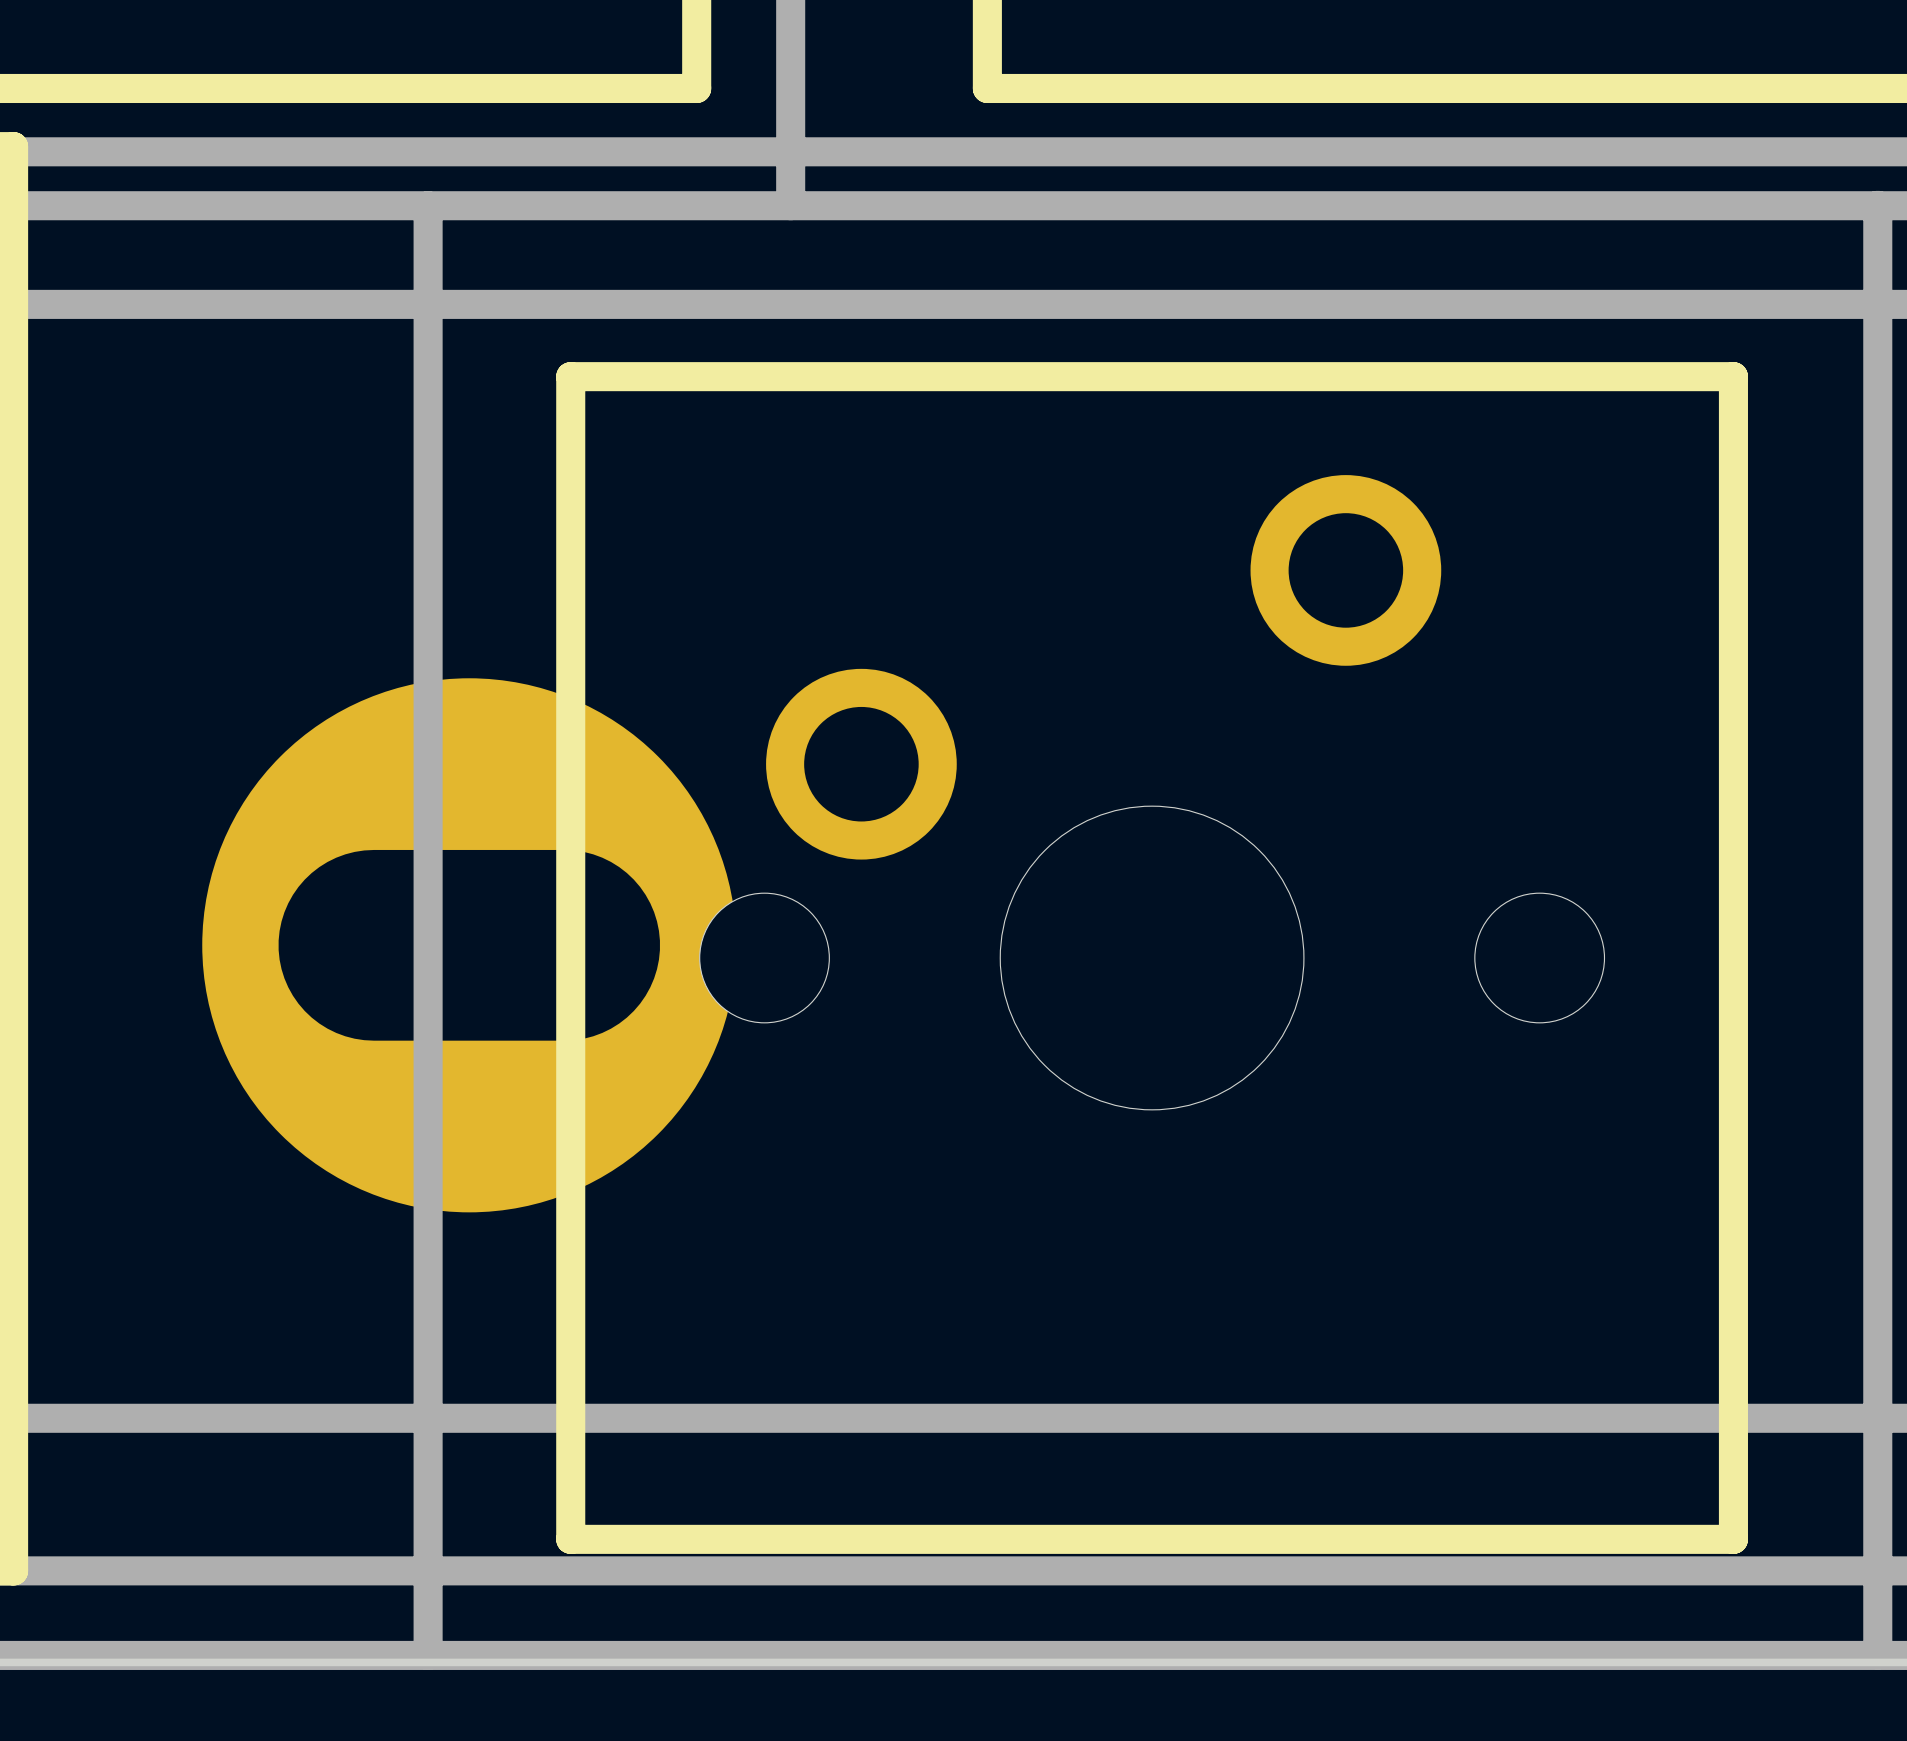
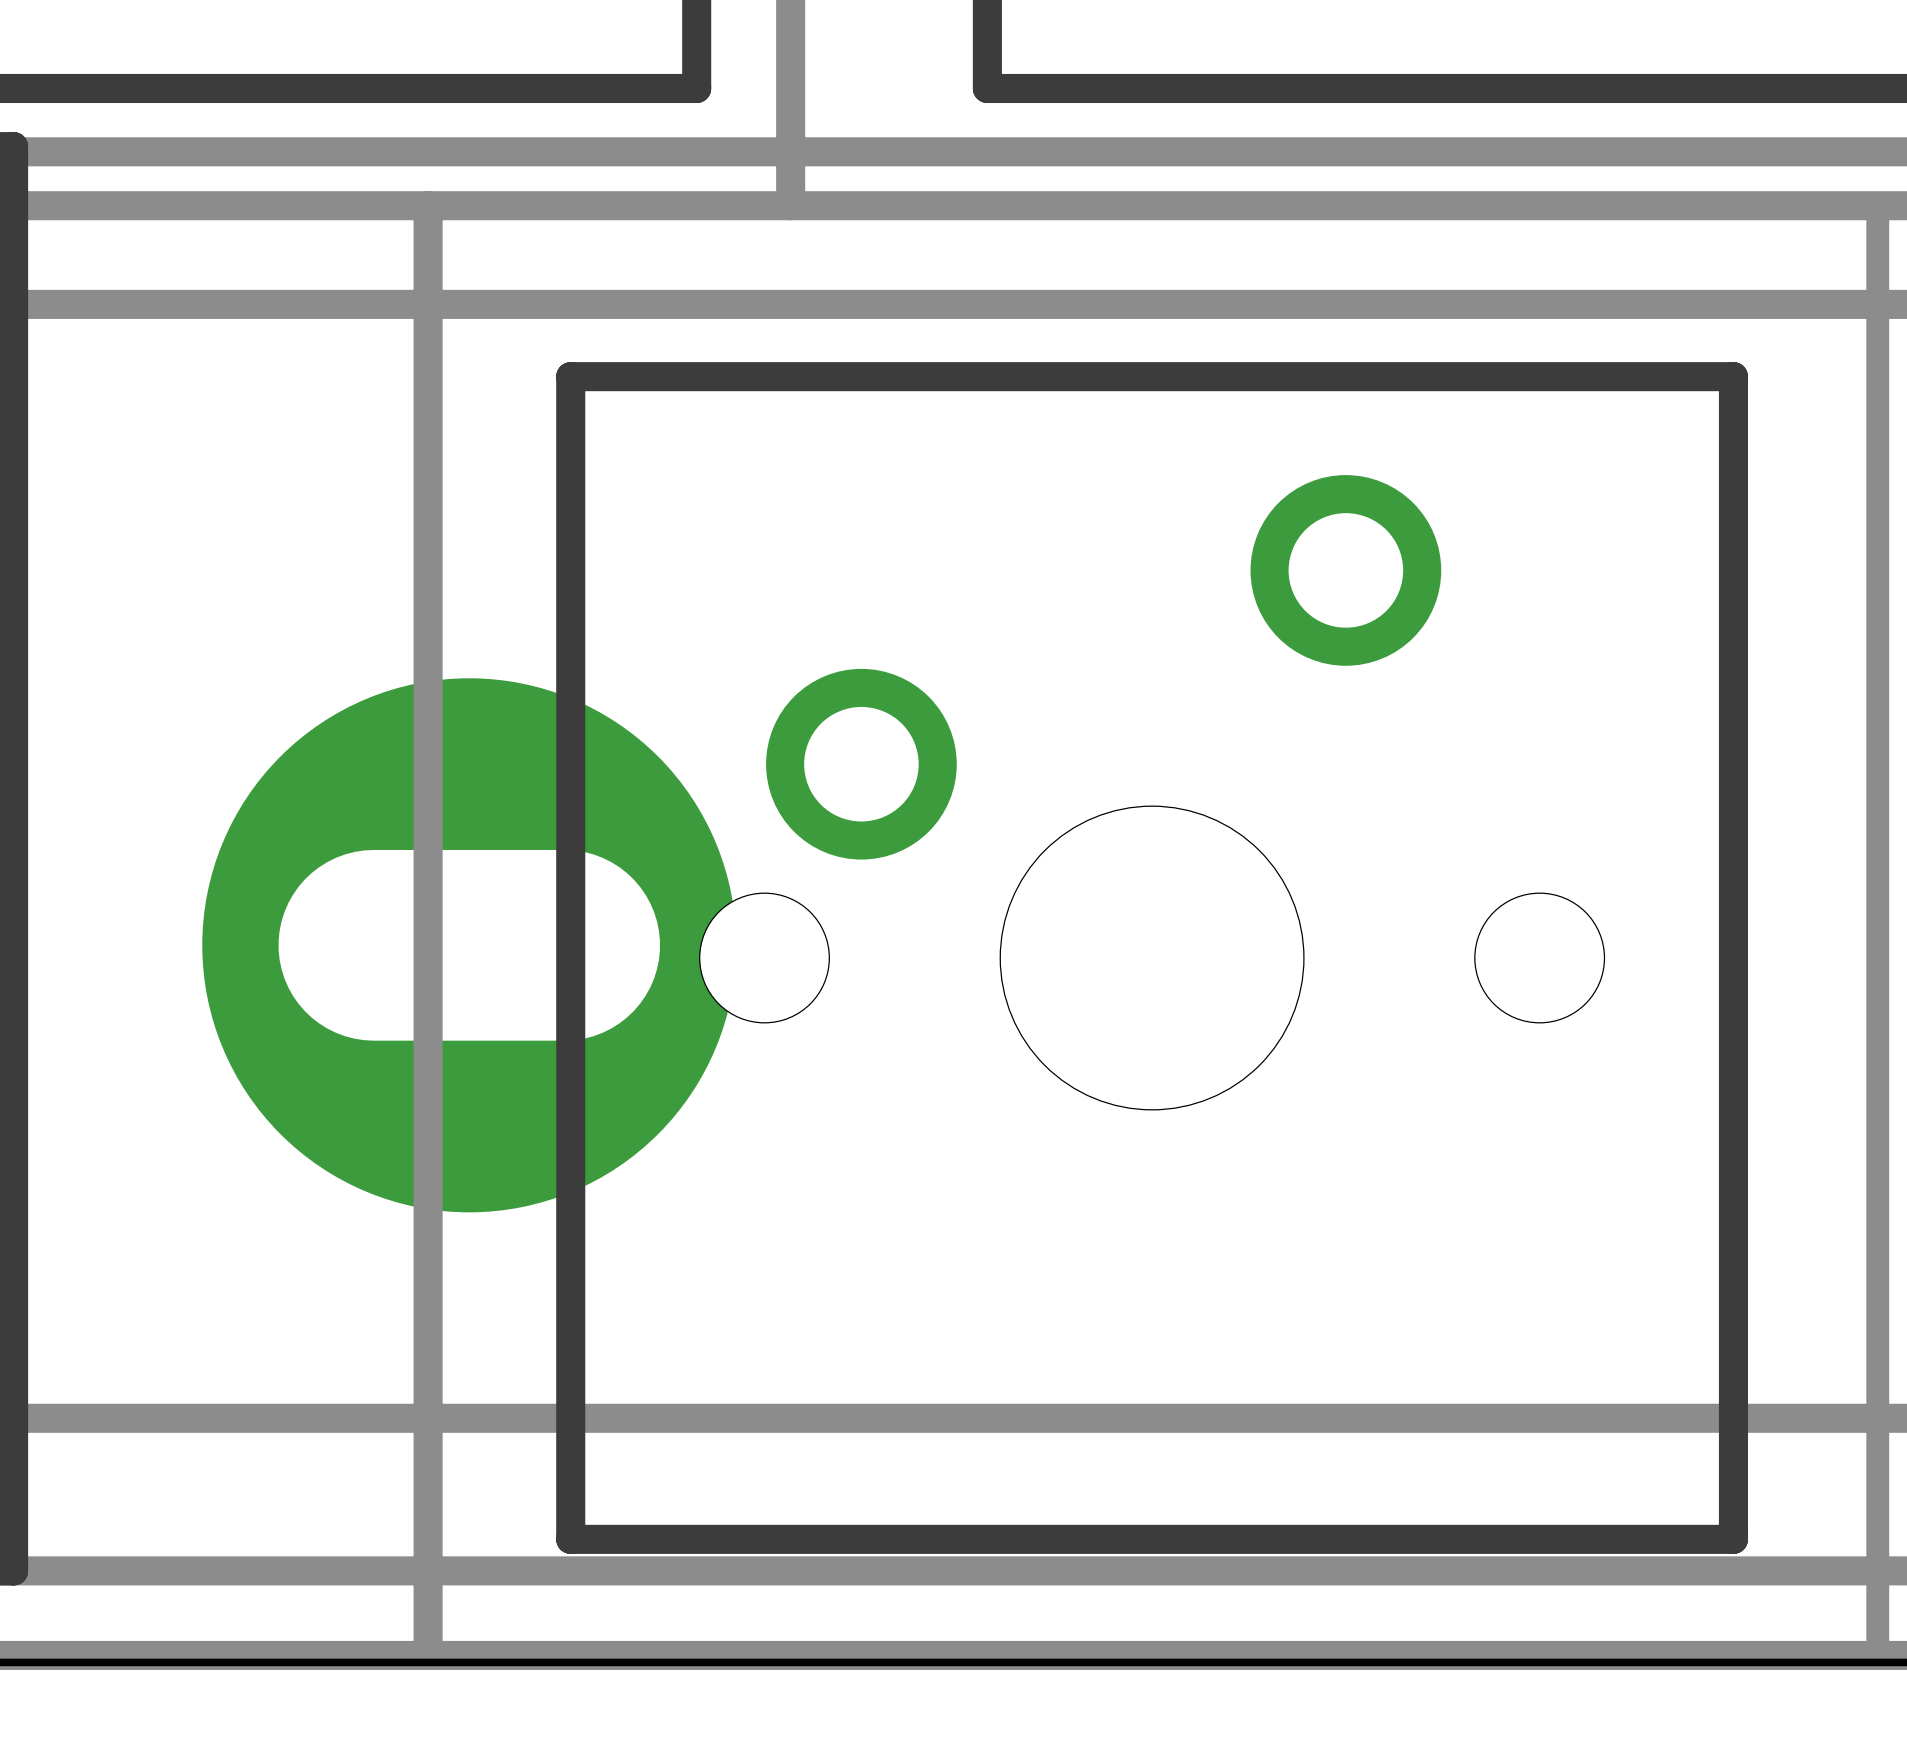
line width: thick (1877, 205) (1877, 1654) -> thin (1877, 205) (1877, 1654)

